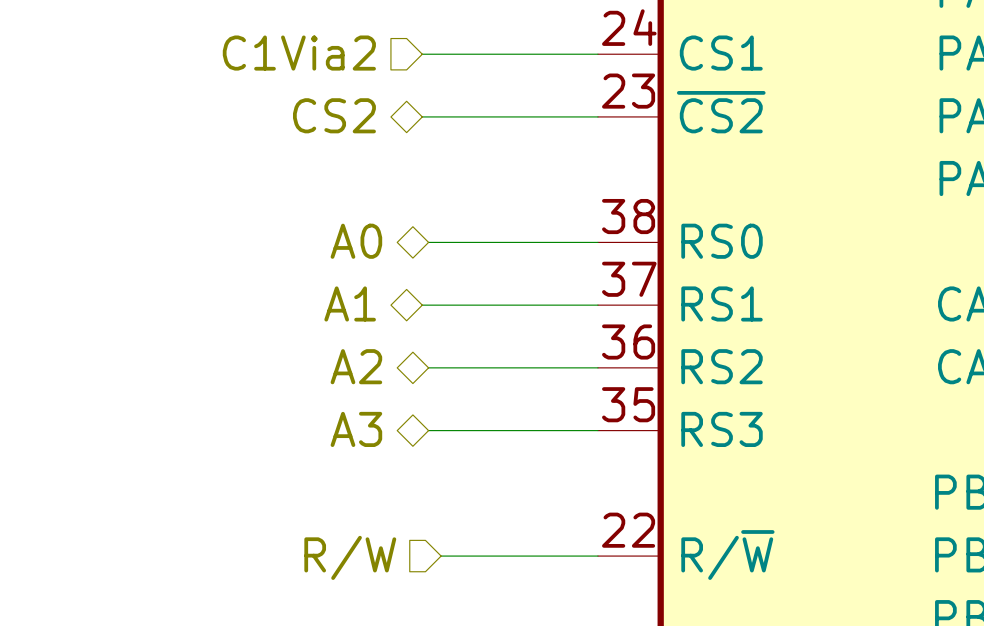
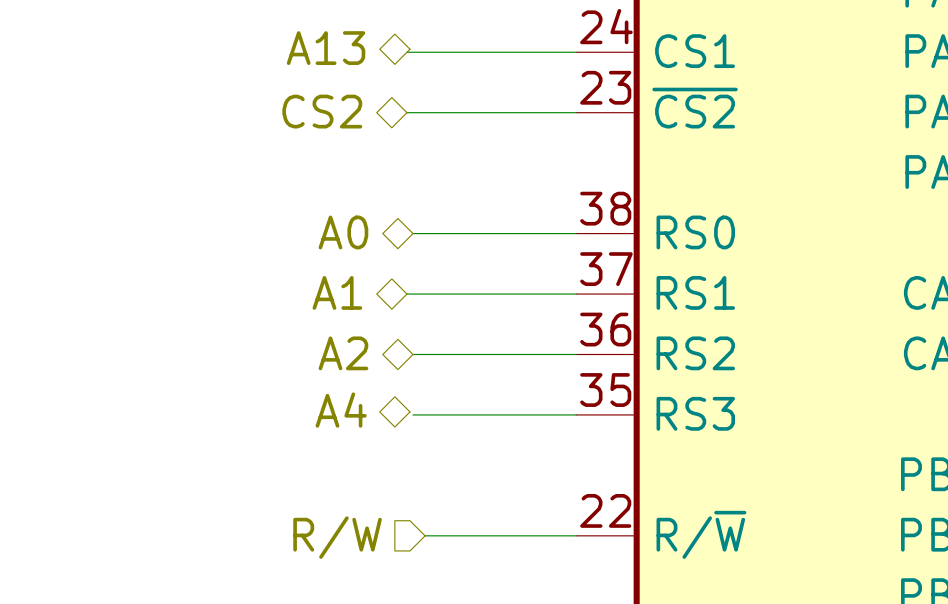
hierarchical label shape: input (299, 53) -> bidirectional (326, 48)
hierarchical label: C1Via2 (299, 53) -> A13 (326, 48)
hierarchical label: A3 (356, 429) -> A4 (341, 410)

